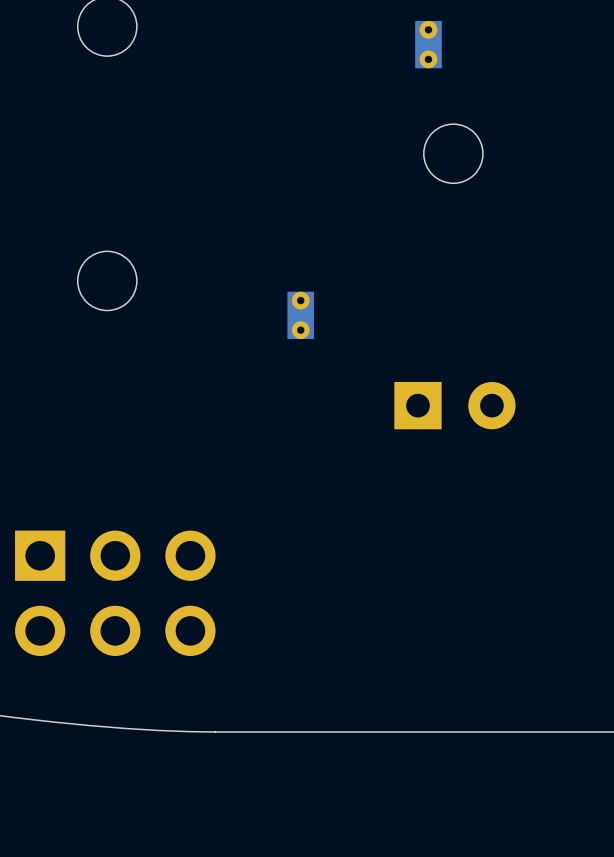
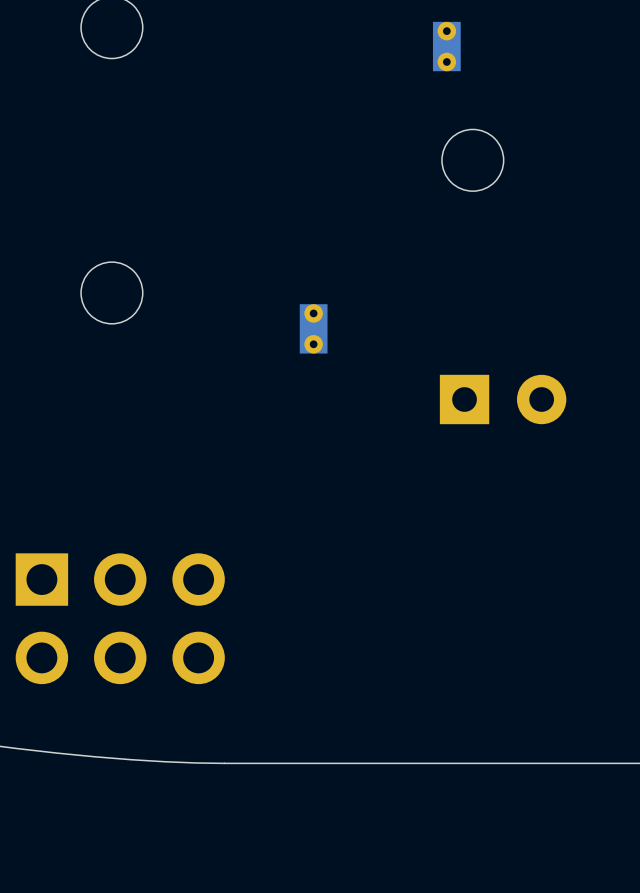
part position: (454, 405) -> (503, 399)

